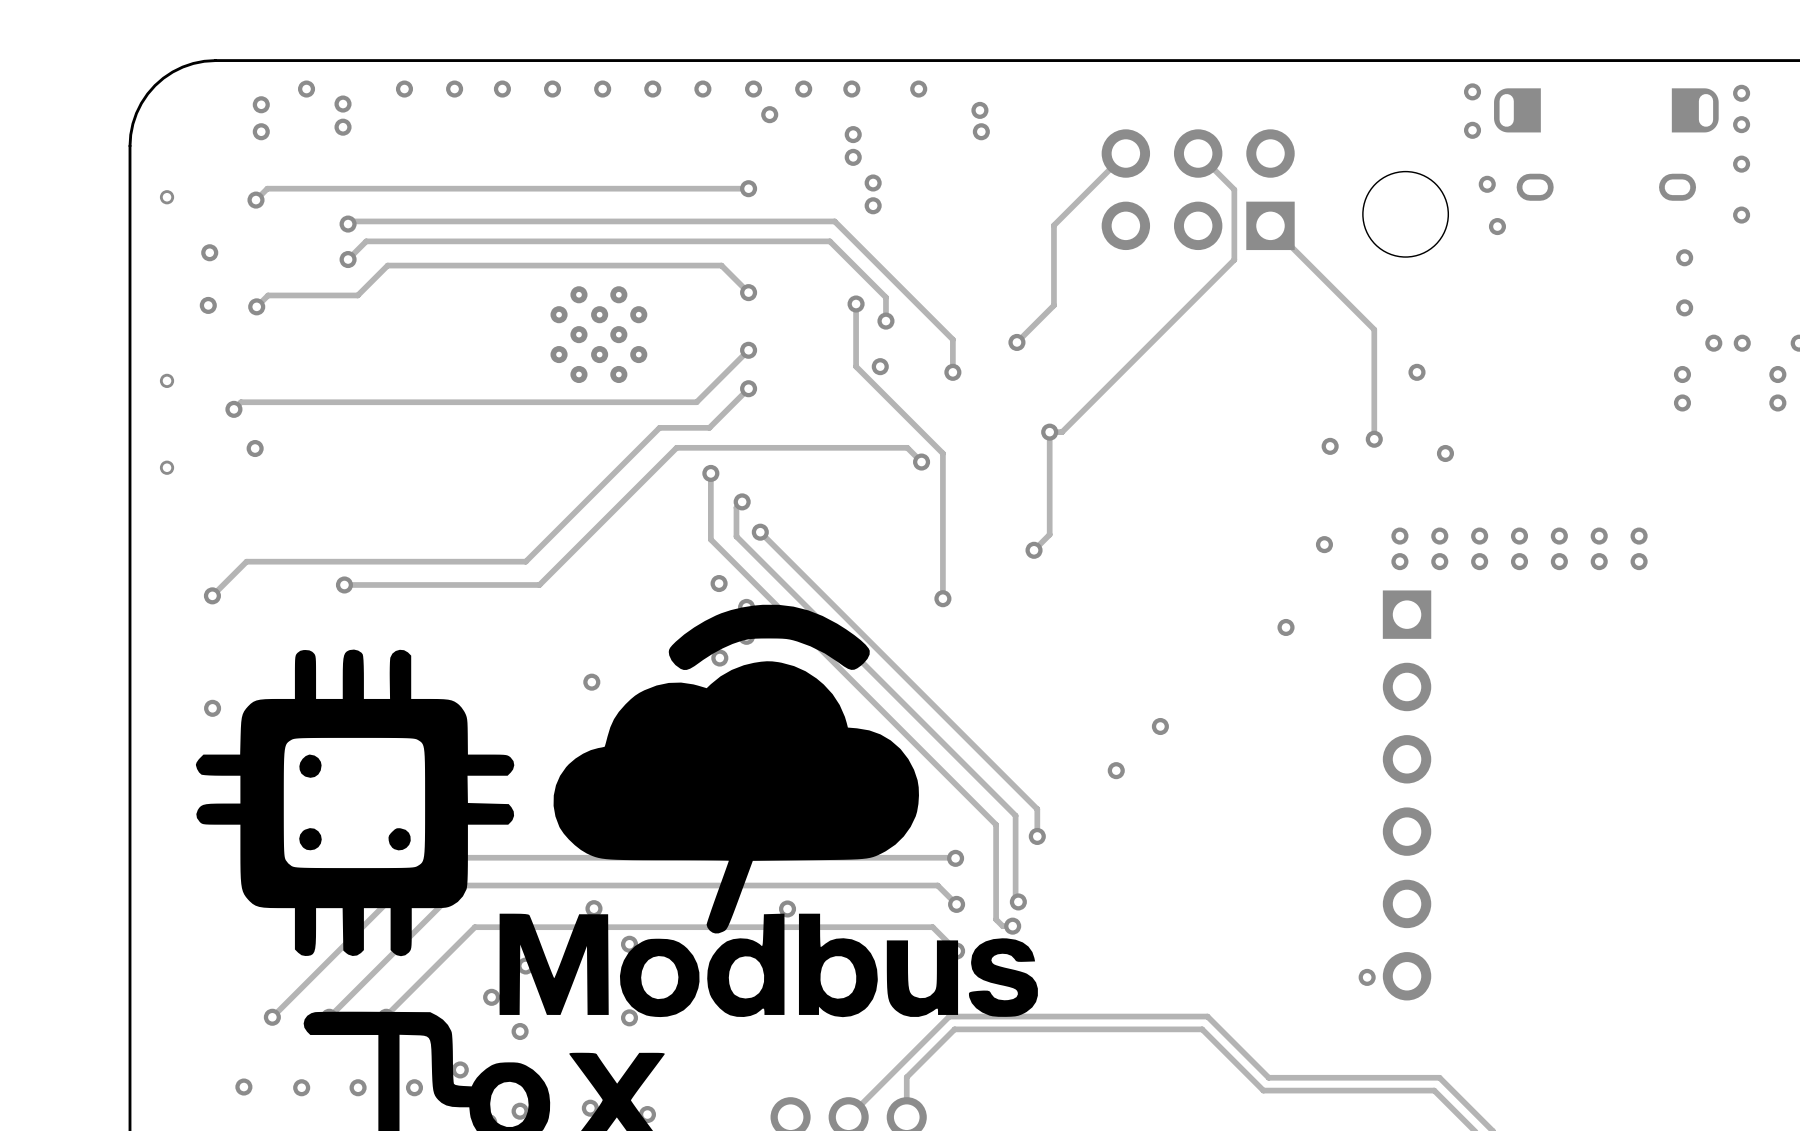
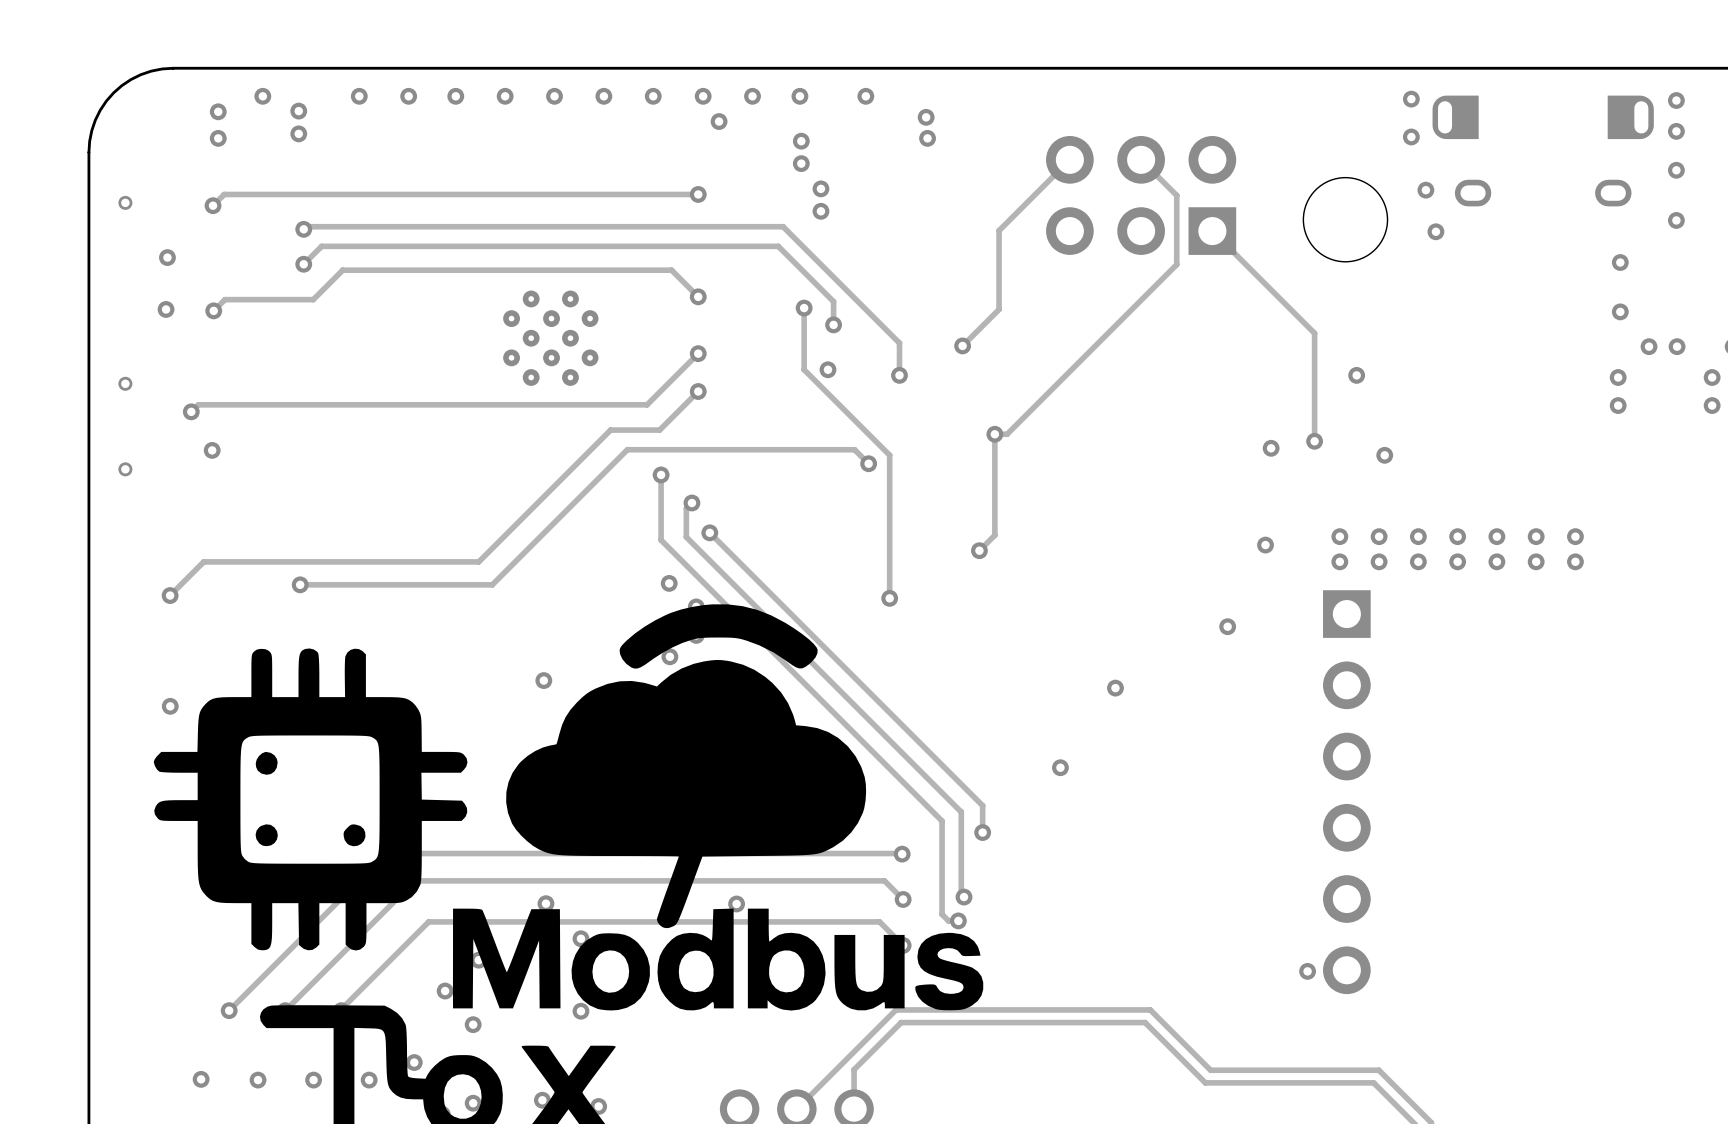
via position: (1160, 726) -> (1115, 688)

